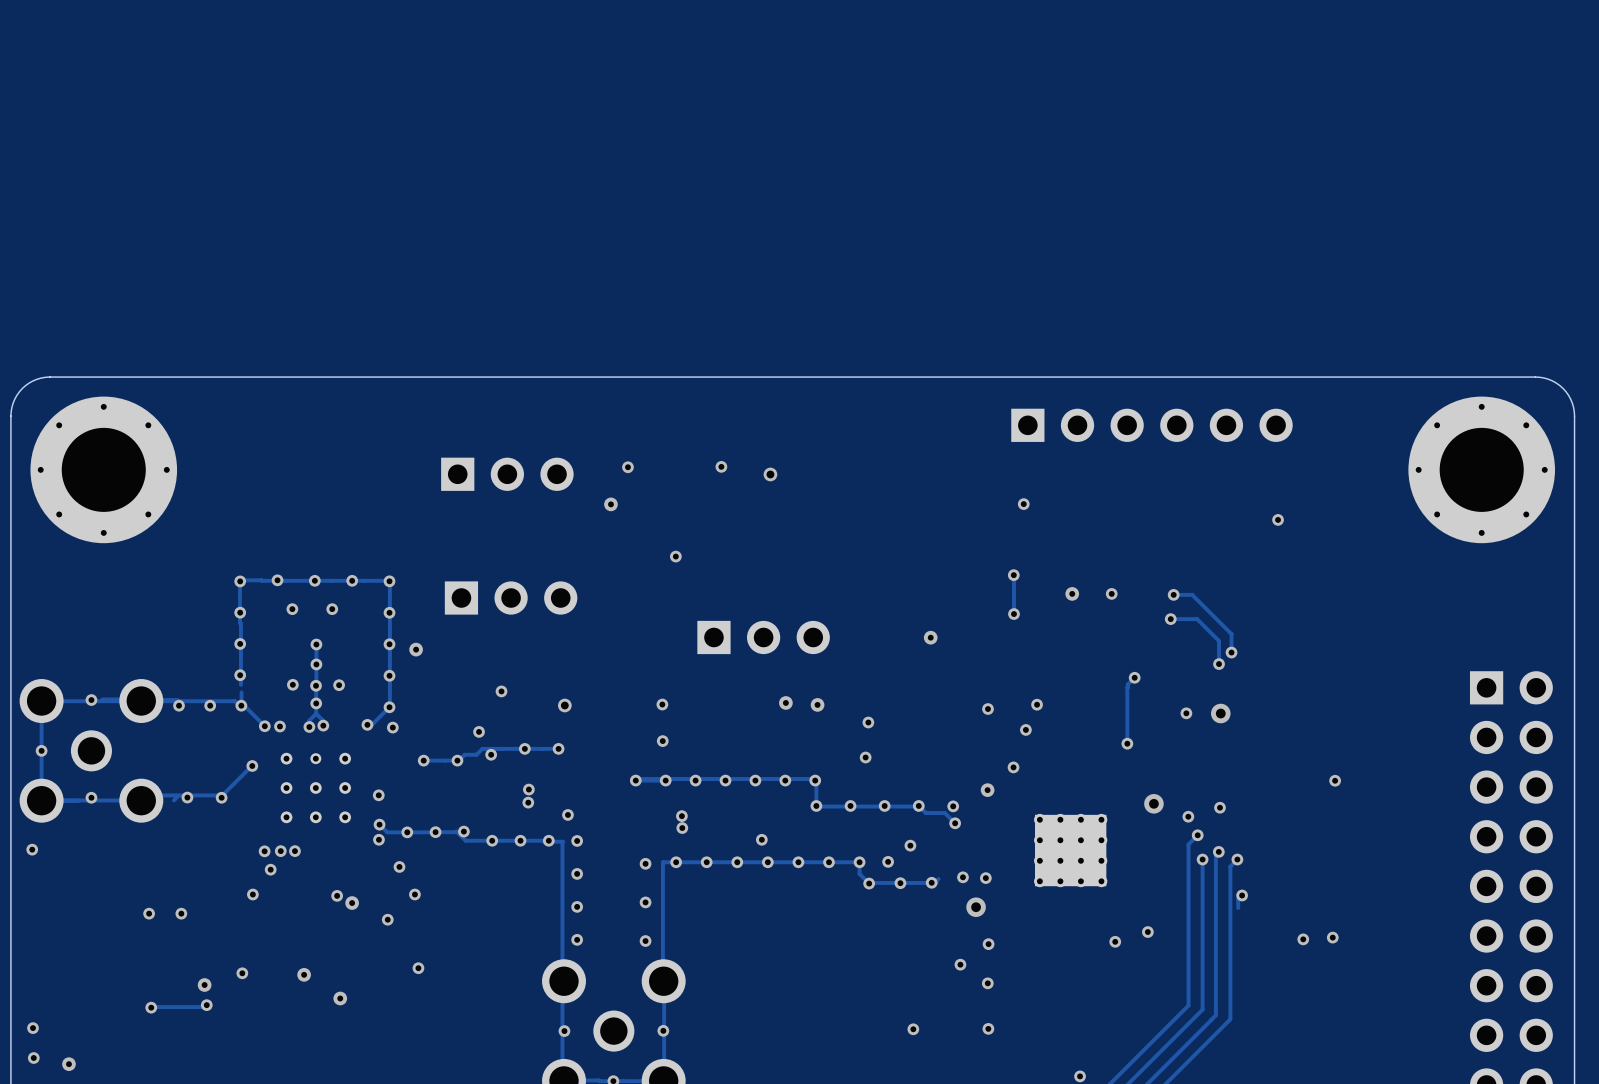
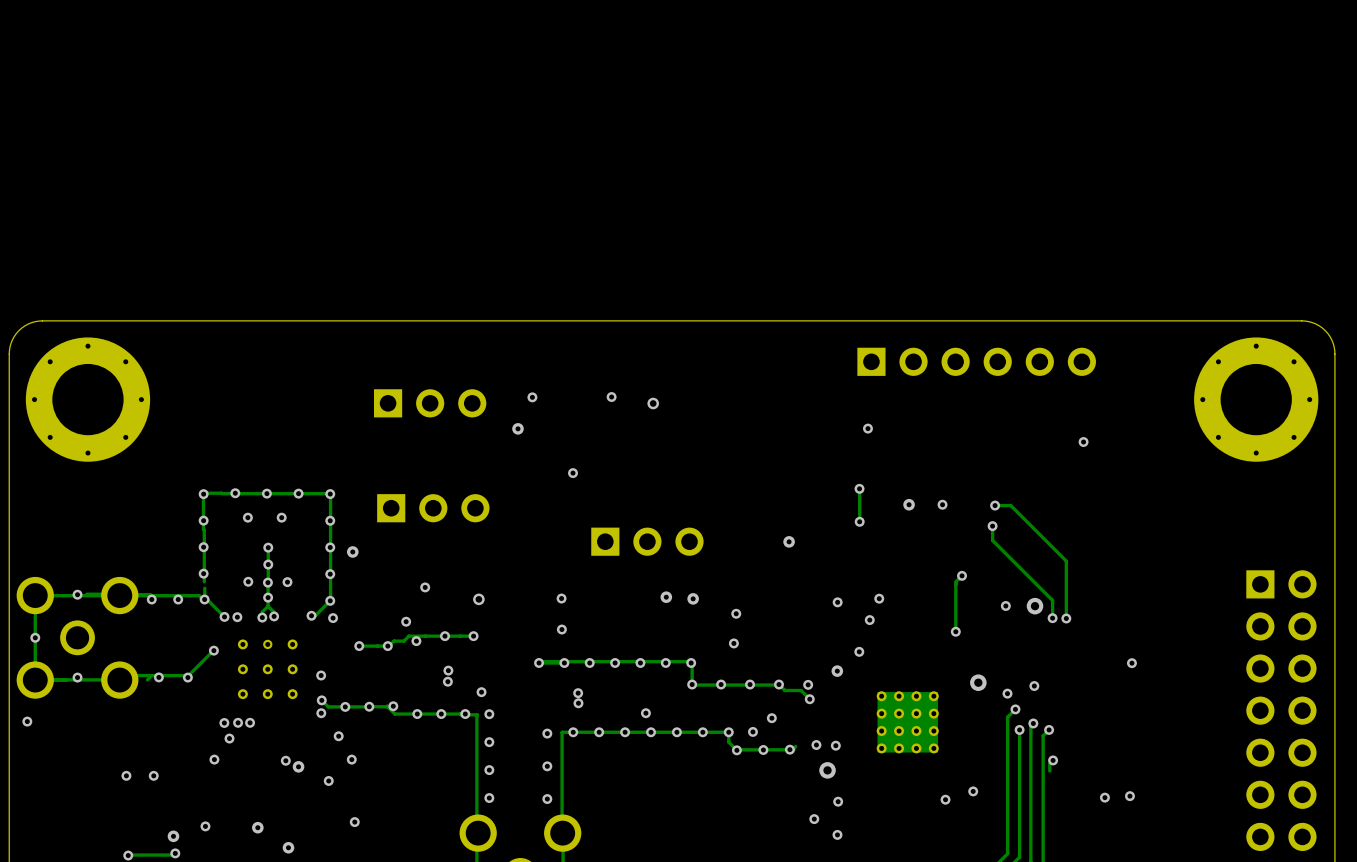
track: (1170, 619) (1197, 619) (1219, 641) (1219, 664) -> (992, 526) (992, 540) (1052, 600) (1052, 618)
track: (1231, 634) (1231, 652) -> (1044, 538) (1066, 561) (1066, 618)
via: (1231, 652) -> none
via: (1219, 664) -> none
via: none -> (1052, 618)
via: none -> (1066, 618)

